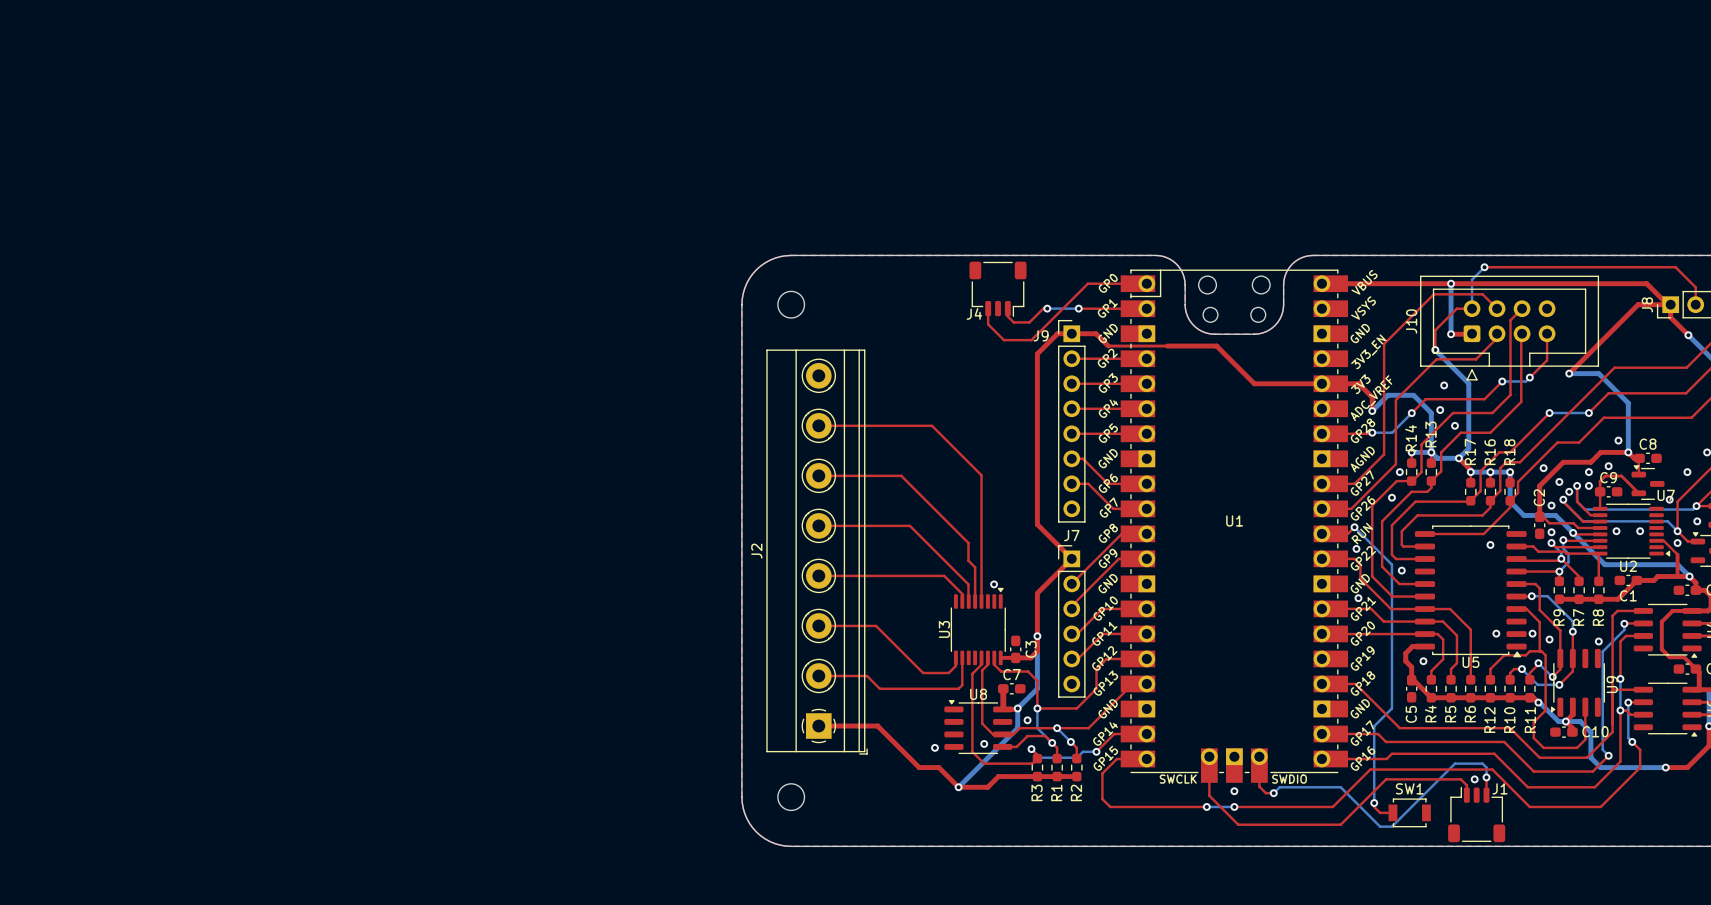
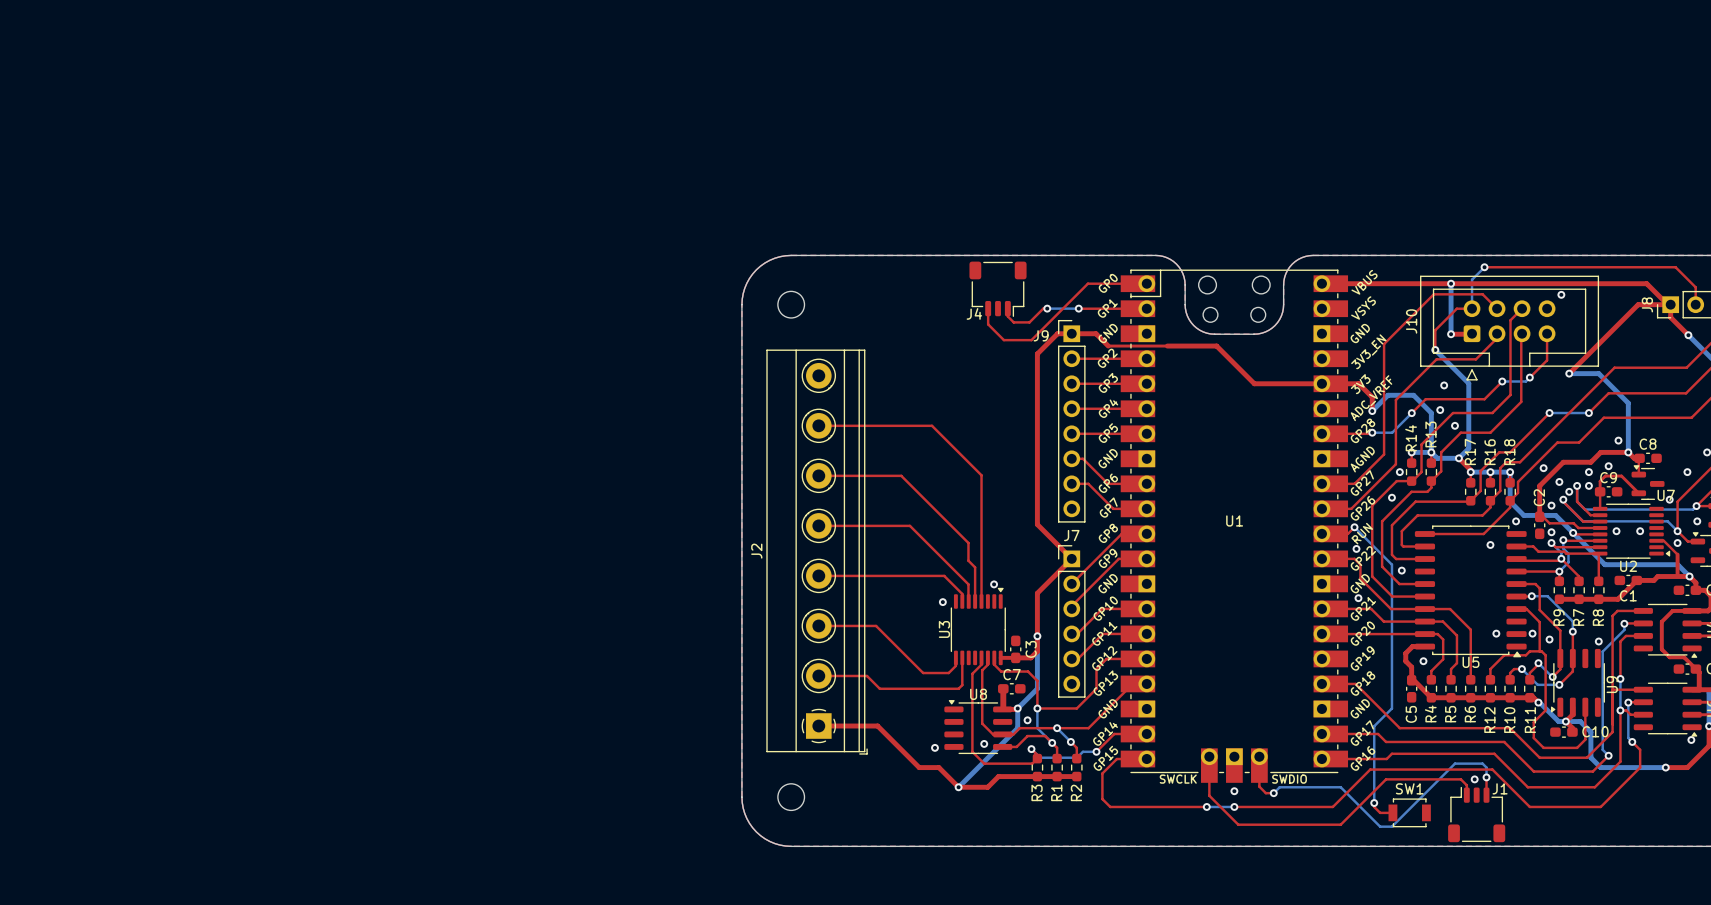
via: none -> (1561, 294)
via: none -> (1516, 521)
via: none -> (942, 602)
via: none -> (1691, 740)

